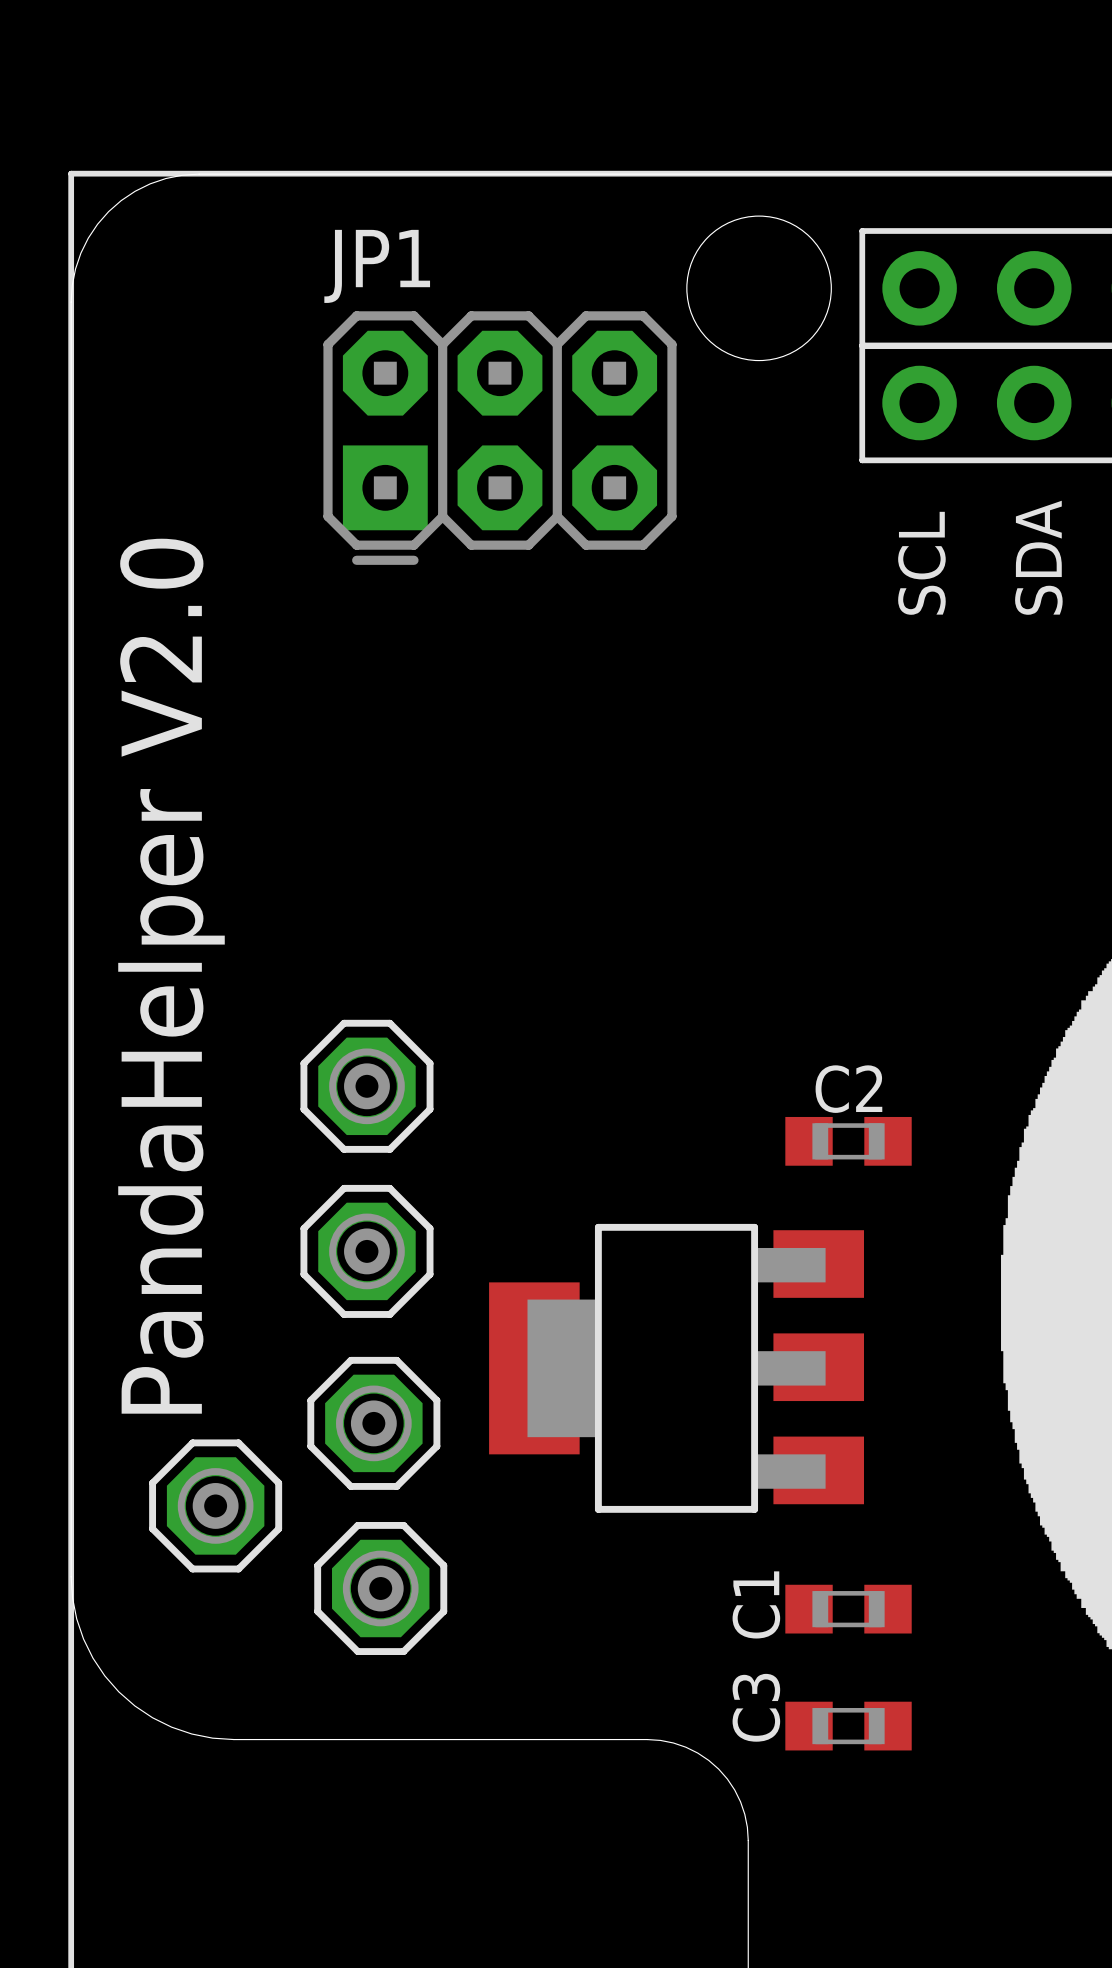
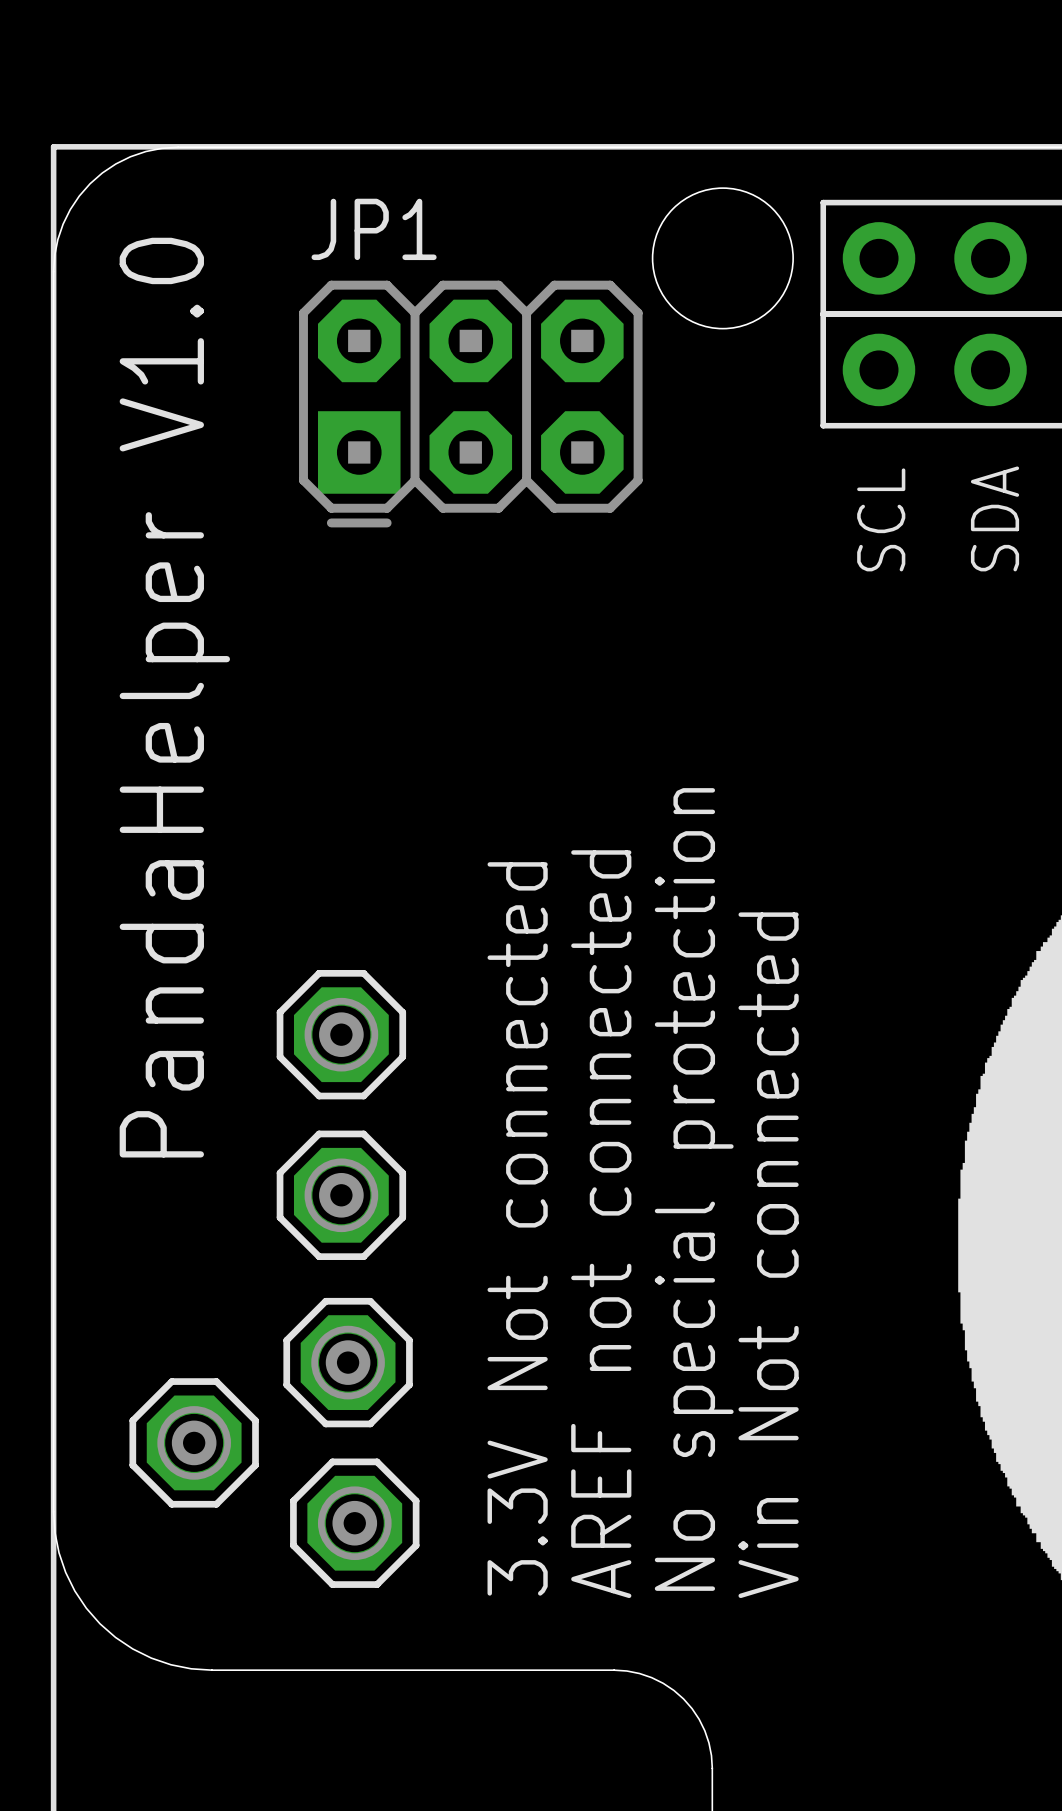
text: PandaHelper V2.0 (171, 976) -> PandaHelper V1.0 (174, 697)
C2: (848, 1141) -> none
text: none -> No special protection (694, 1189)
text: none -> AREF not connected (601, 1224)
text: none -> 3.3V Not connected (517, 1228)
text: none -> Vin Not connected (768, 1255)
part: (676, 1368) -> none
C1: (848, 1609) -> none
C3: (848, 1726) -> none

